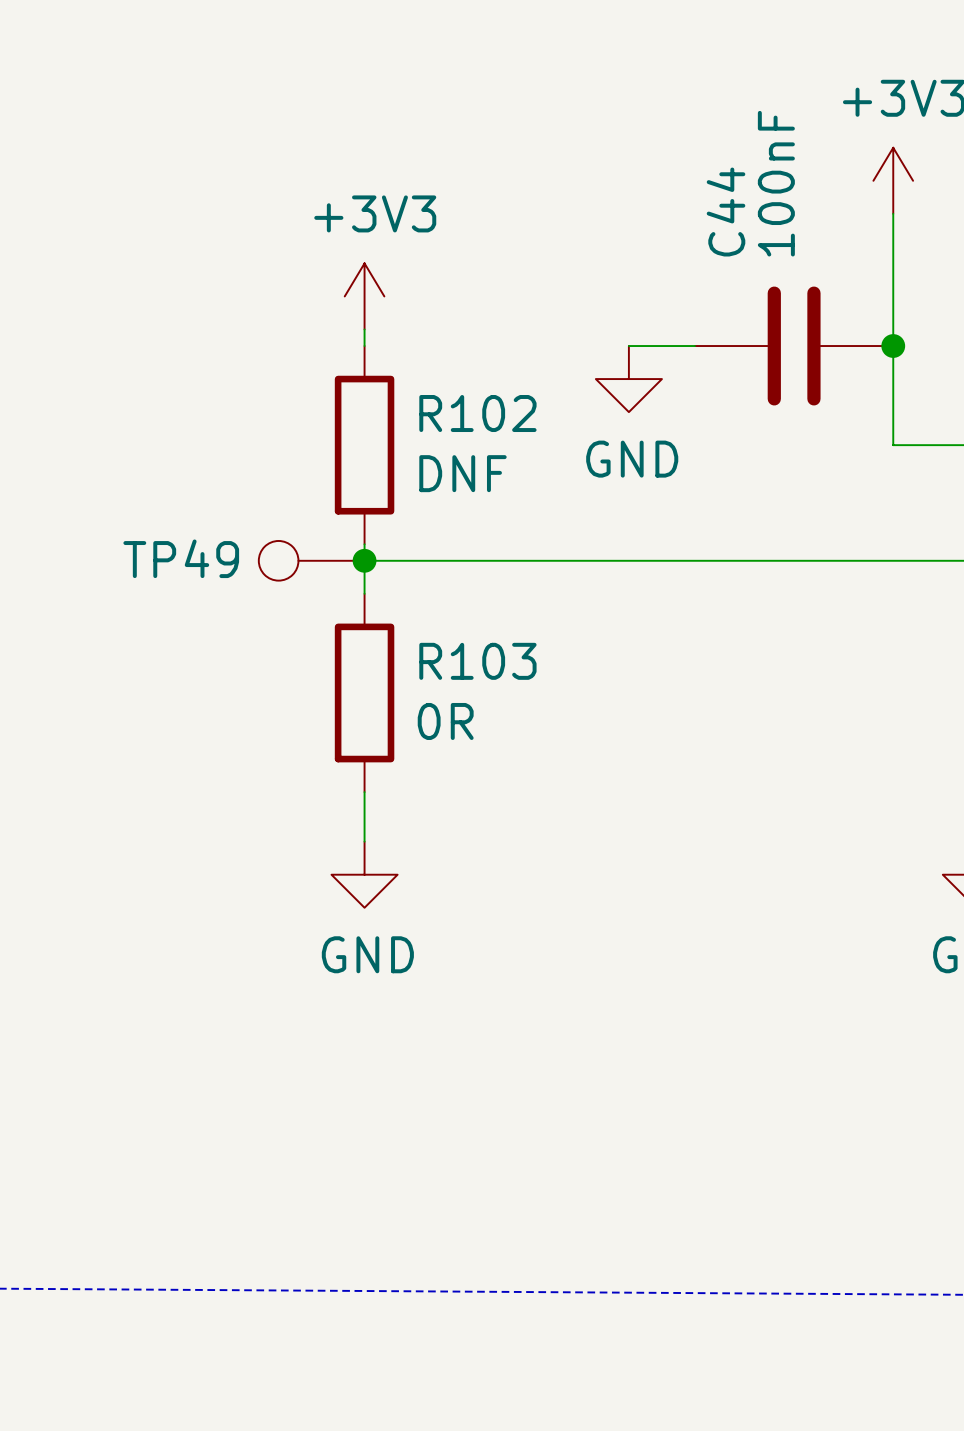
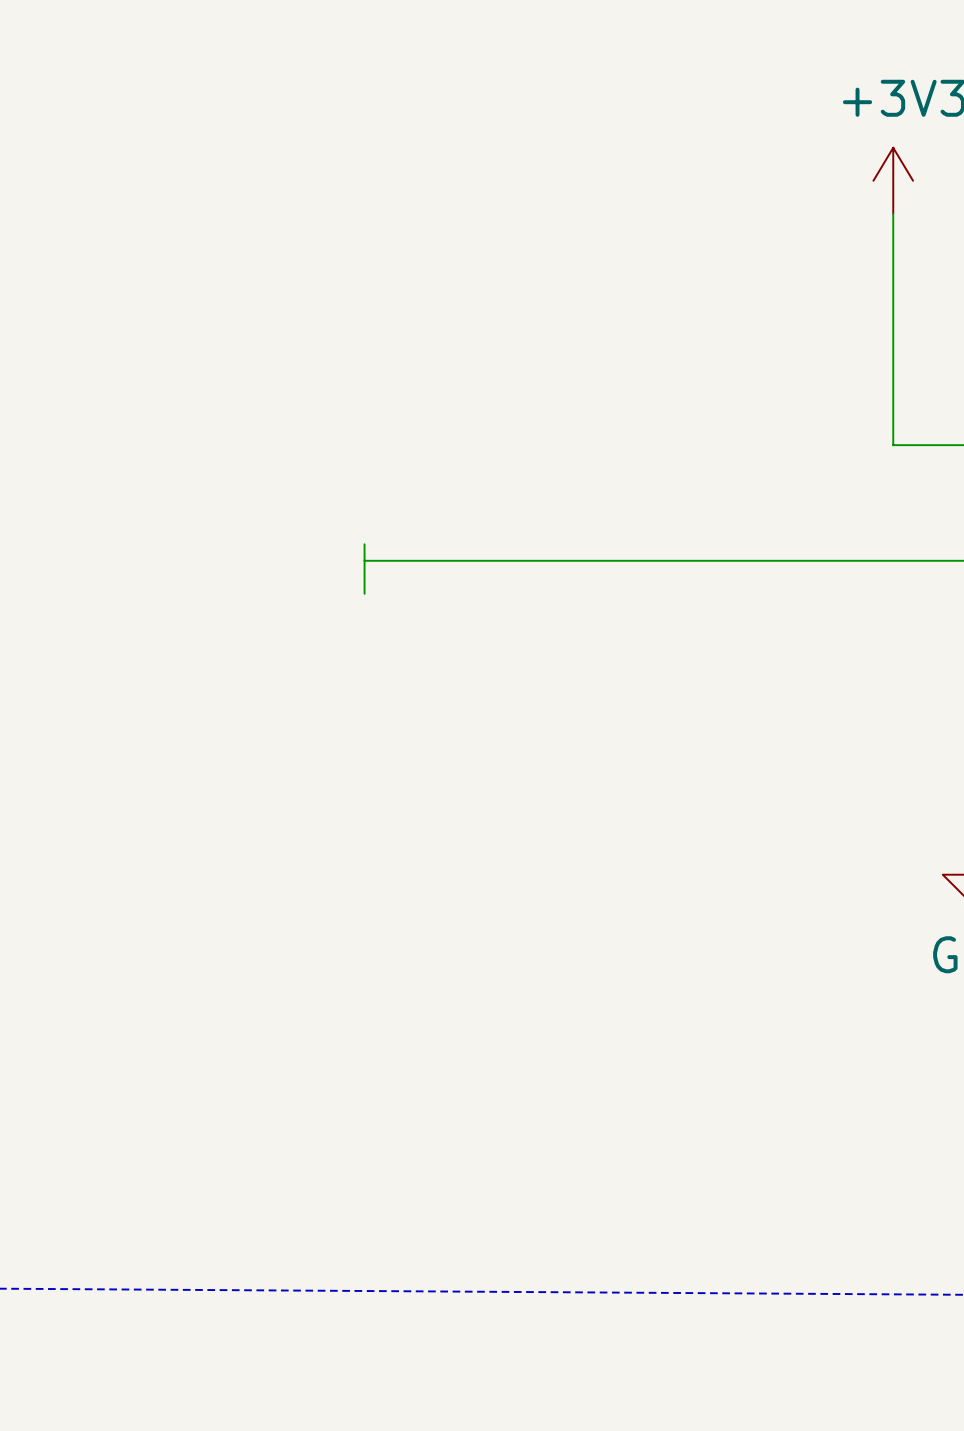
power symbol: +3V3 (364, 296) -> none
wire: (364, 329) (364, 346) -> none
wire: (628, 346) (694, 346) -> none
C44: 100nF (794, 346) -> none
junction: (893, 346) -> none
power symbol: GND (628, 379) -> none
R102: DNF (364, 445) -> none
TP49: (311, 560) -> none
junction: (364, 560) -> none
R103: 0R (364, 692) -> none
wire: (364, 792) (364, 841) -> none
power symbol: GND (364, 874) -> none

